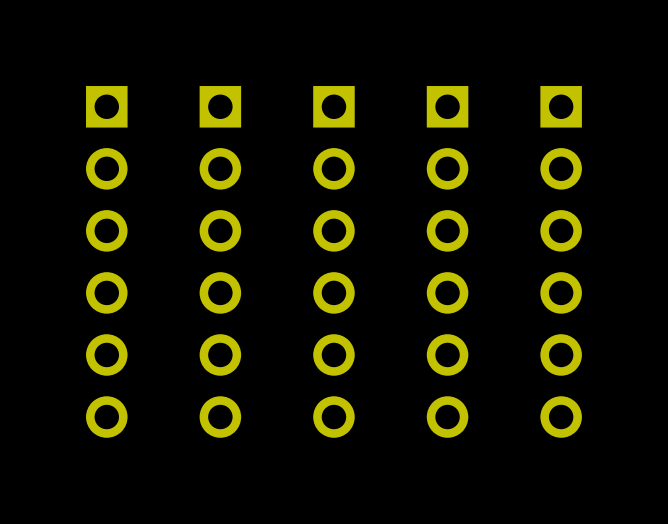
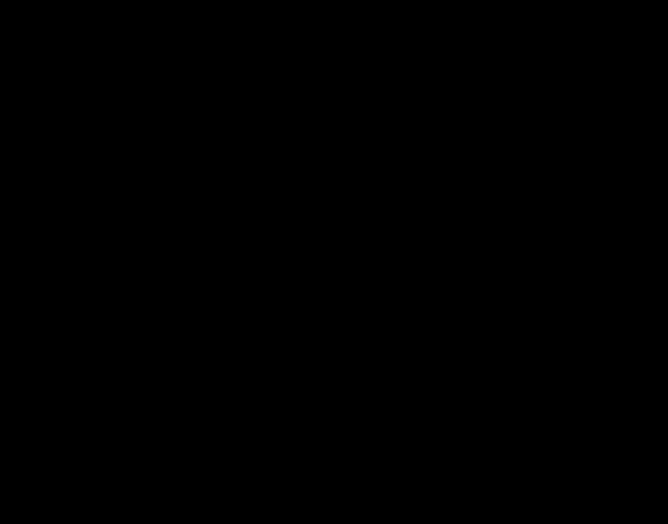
part: (106, 261) -> none
part: (220, 261) -> none
part: (333, 261) -> none
part: (447, 261) -> none
part: (561, 261) -> none

